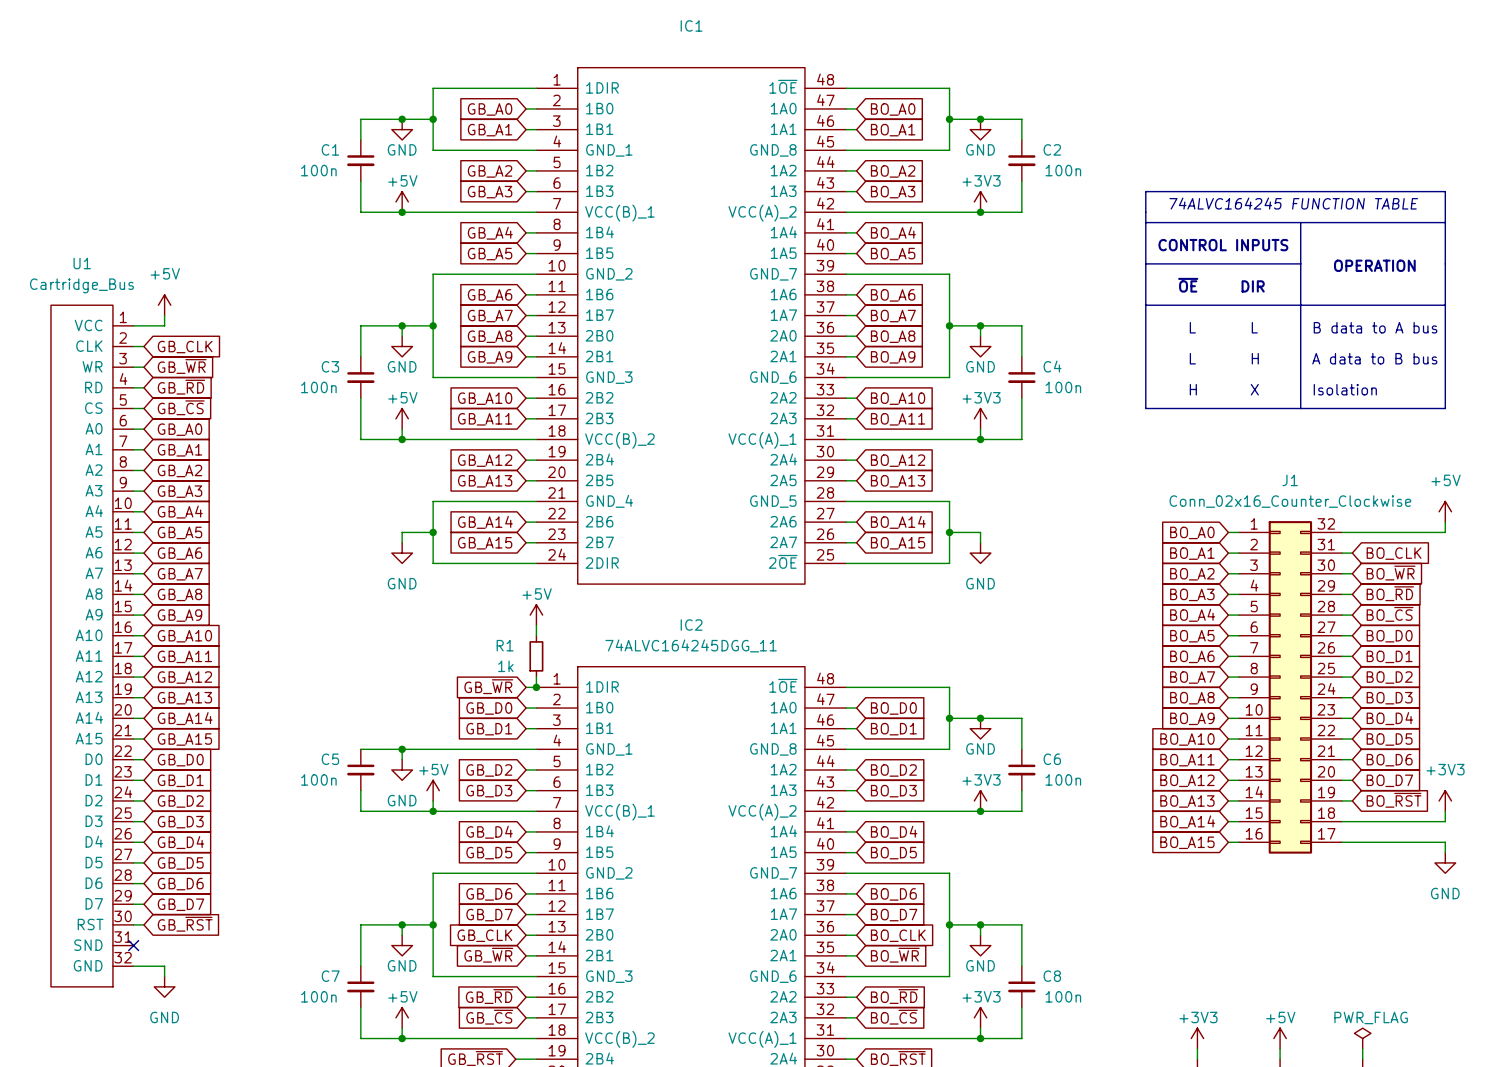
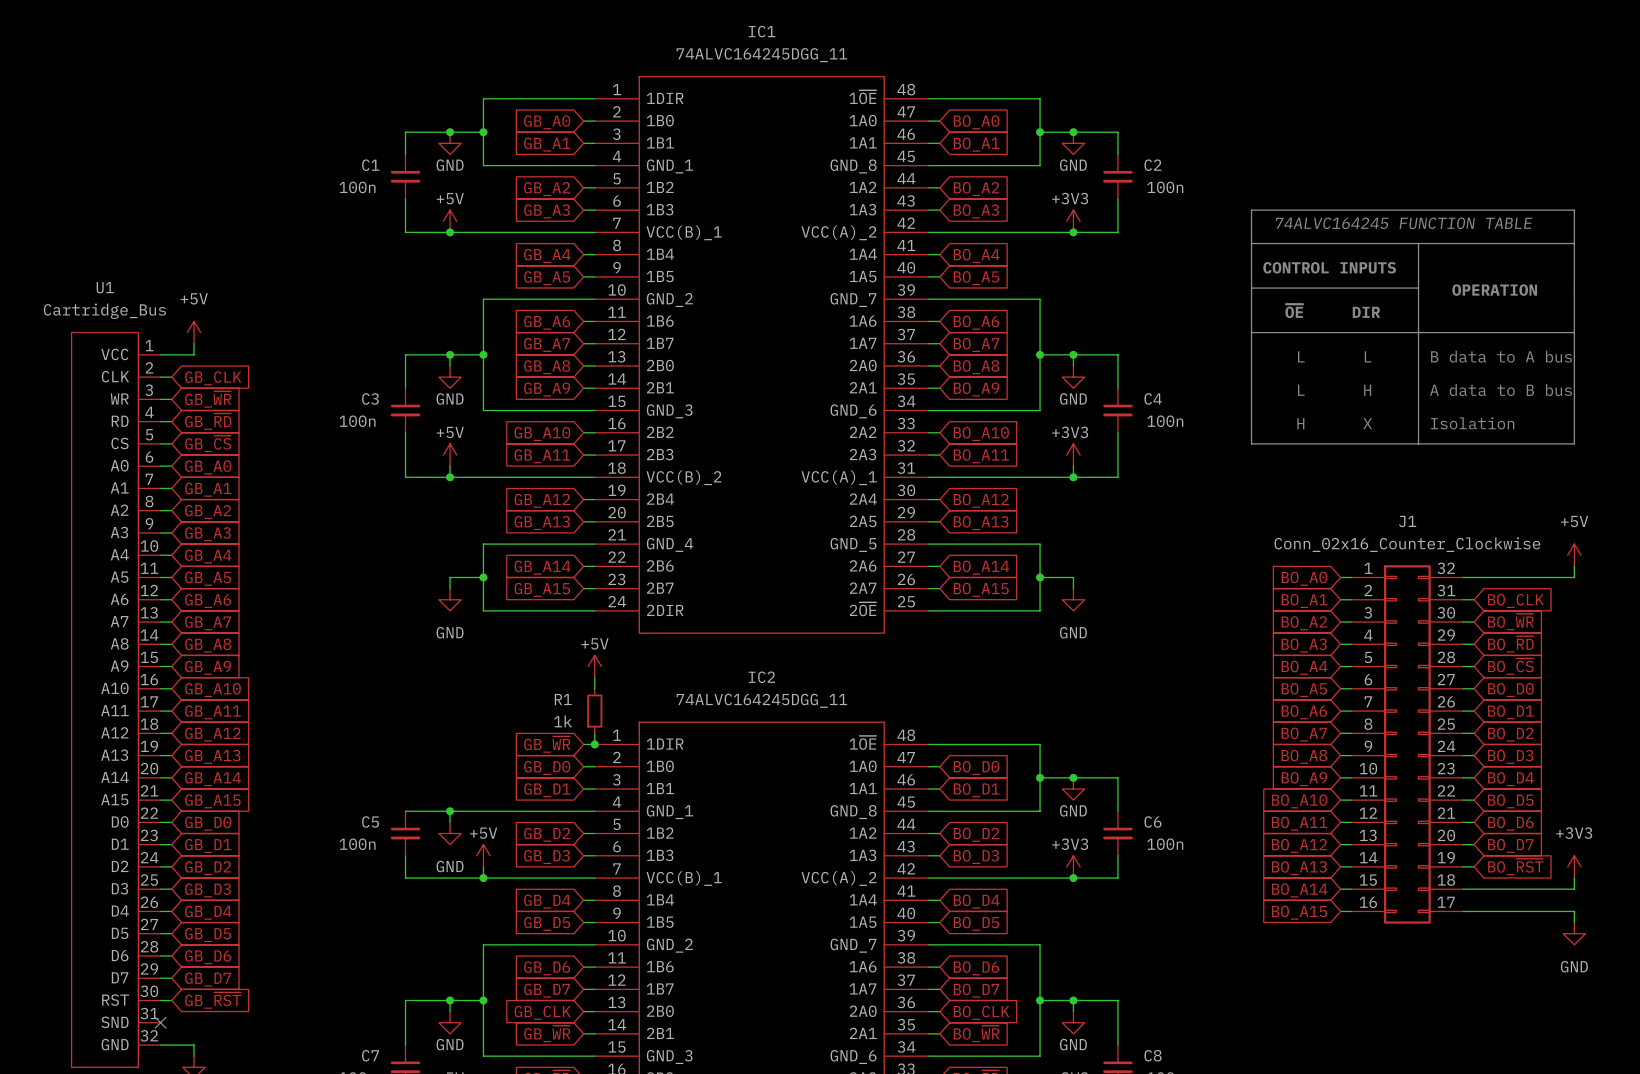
IC1 value: none -> 74ALVC164245DGG_11 (761, 55)

